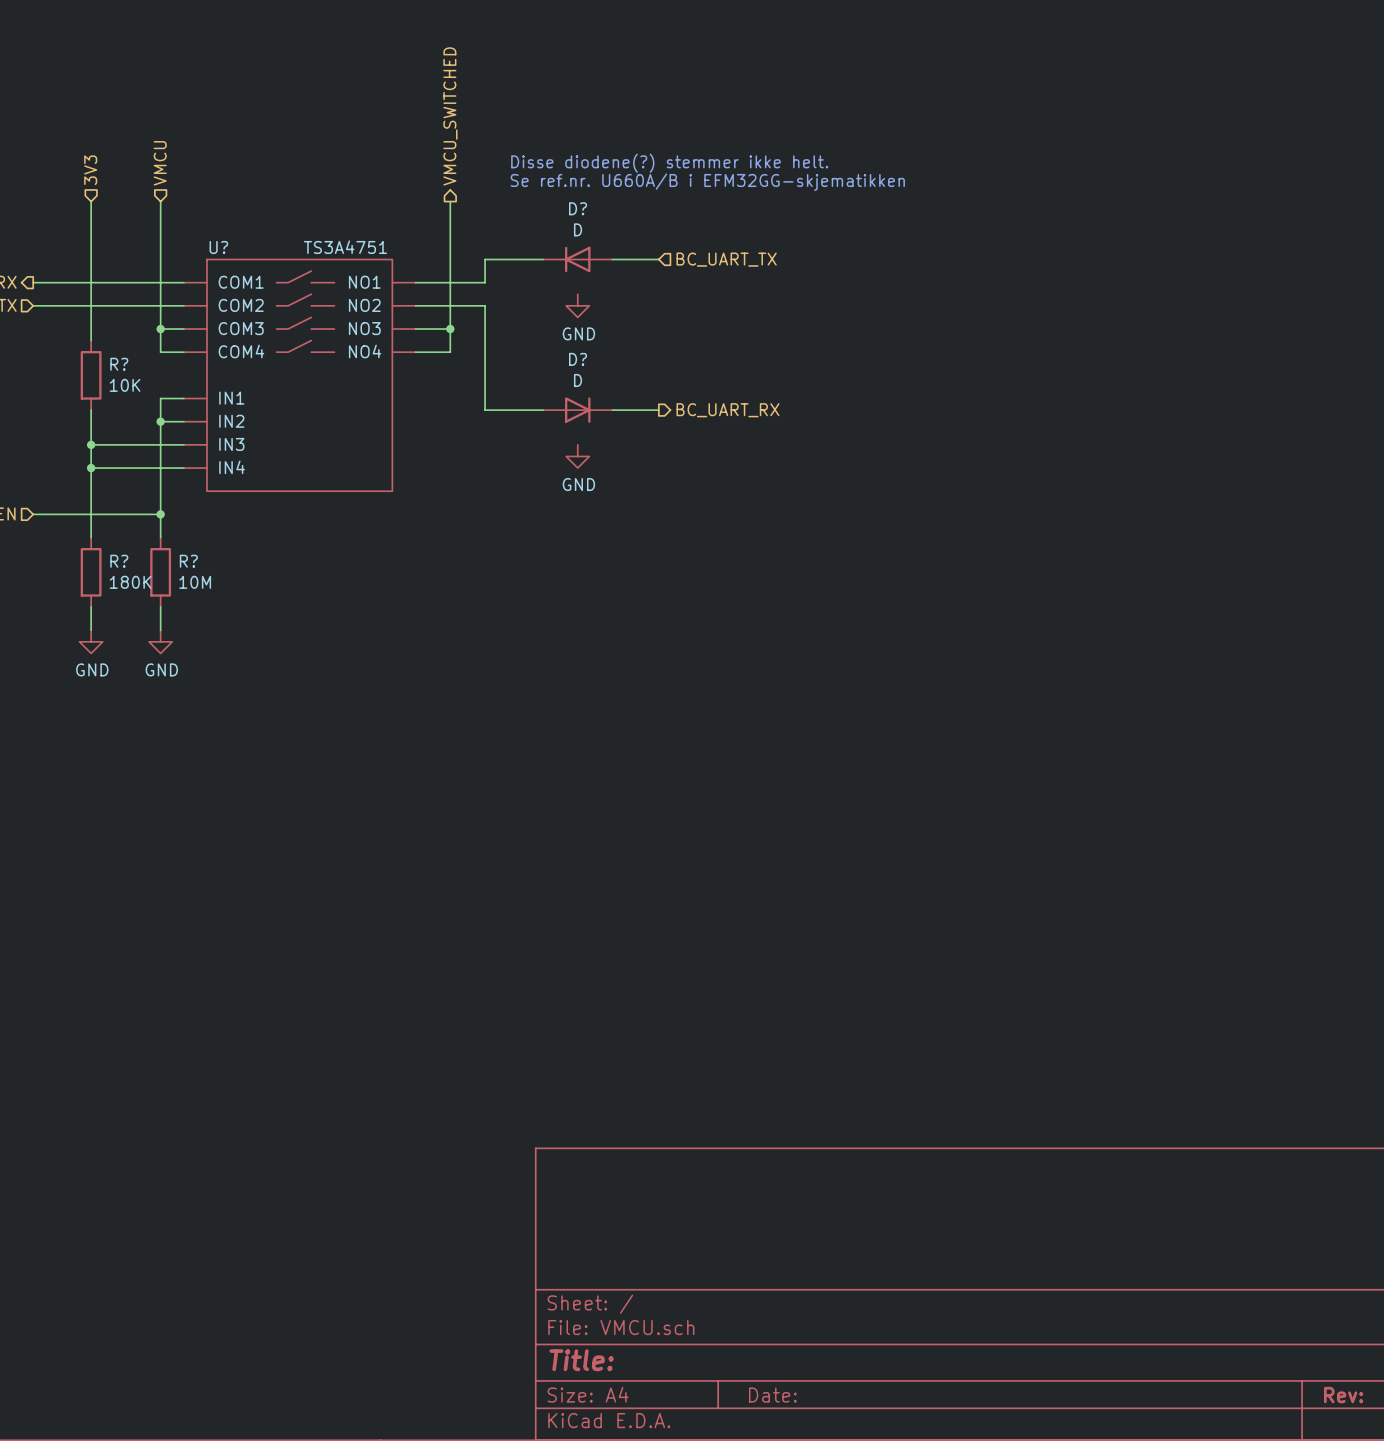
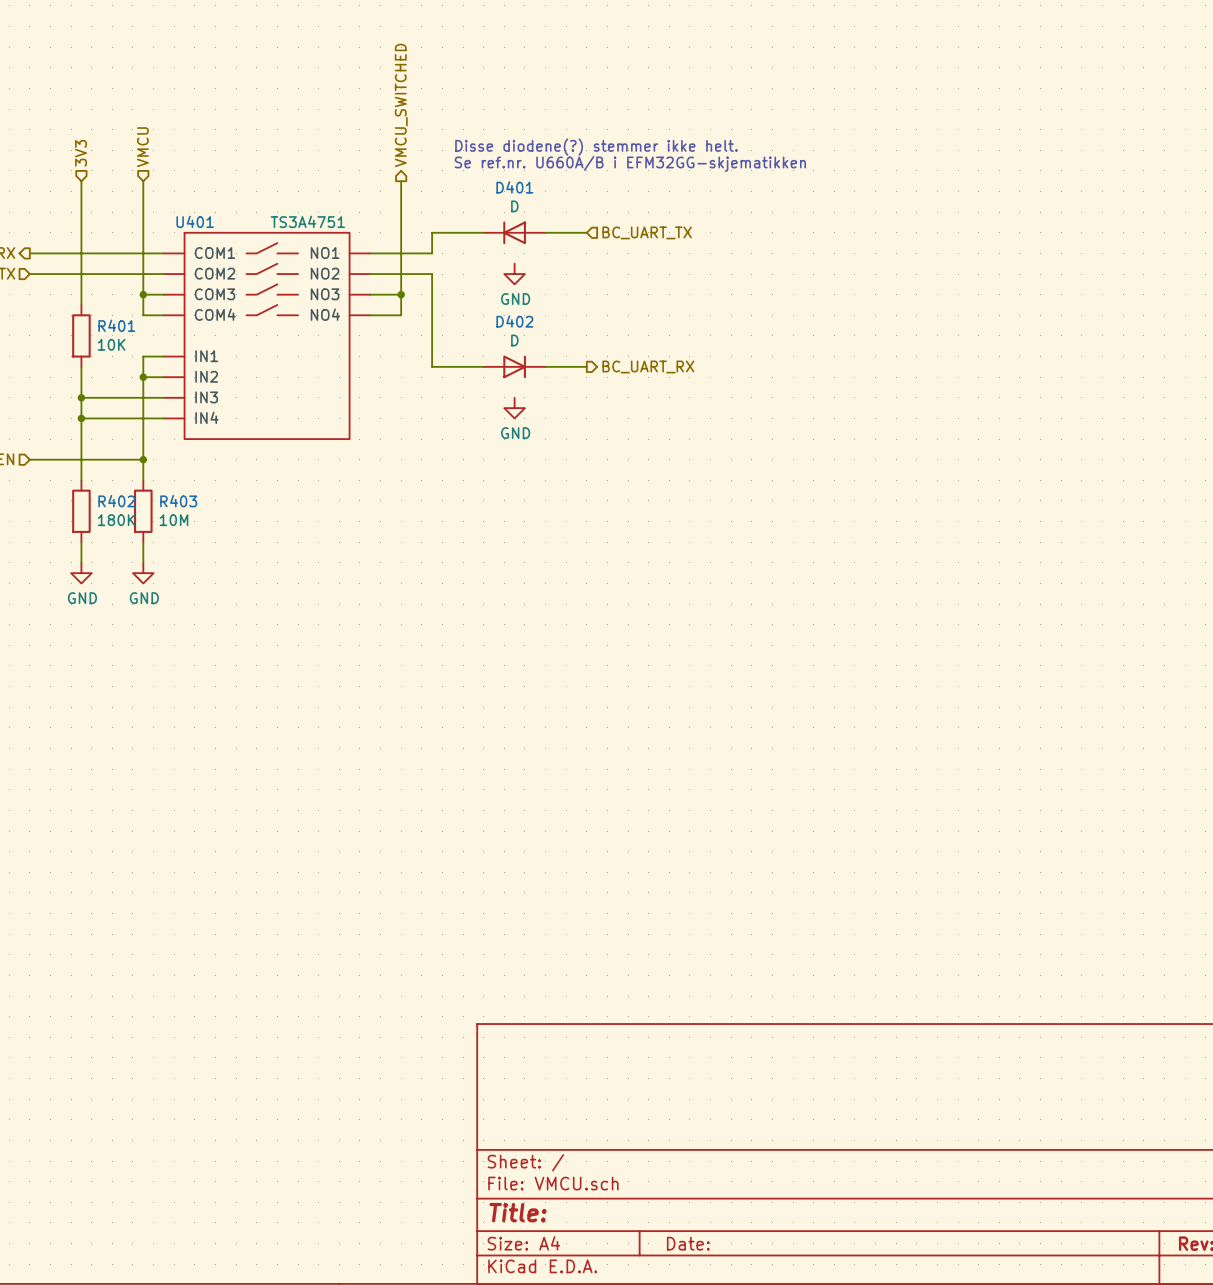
D? name: D? (578, 208) -> D401 (514, 187)
U? name: U? (218, 247) -> U401 (195, 221)
D? name: D? (578, 359) -> D402 (514, 321)
R? name: R? (119, 364) -> R401 (116, 325)
R? name: R? (119, 561) -> R402 (116, 501)
R? name: R? (188, 561) -> R403 (178, 501)

